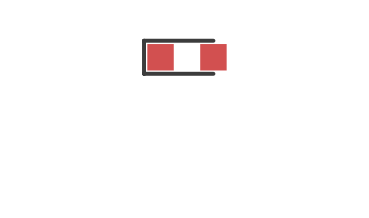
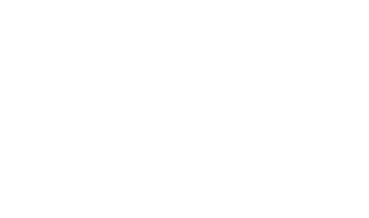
part: (184, 57) -> none

